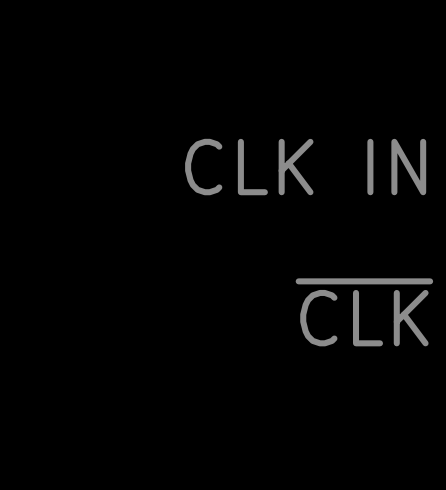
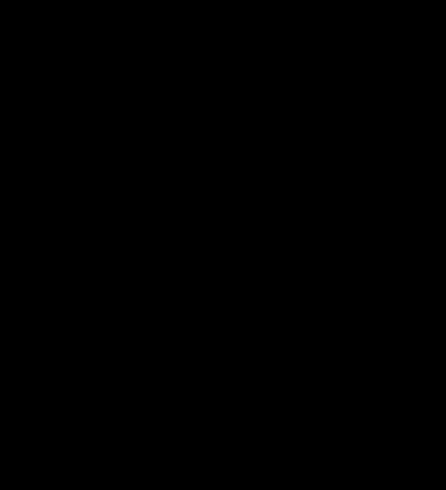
text: CLK IN (305, 167) -> none
text: ~{CLK} (364, 312) -> none

